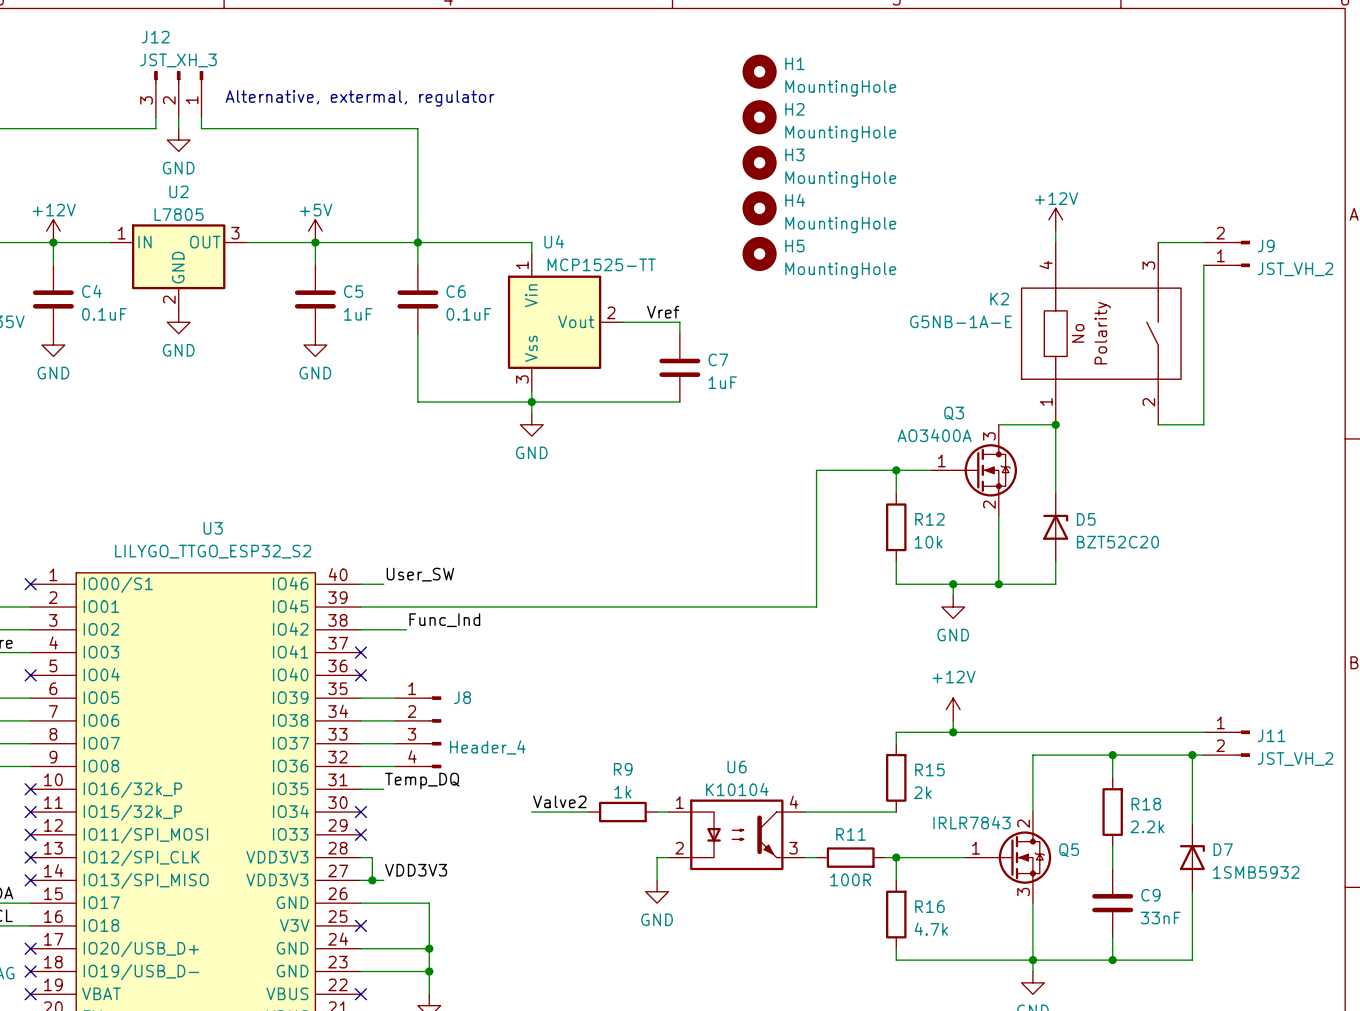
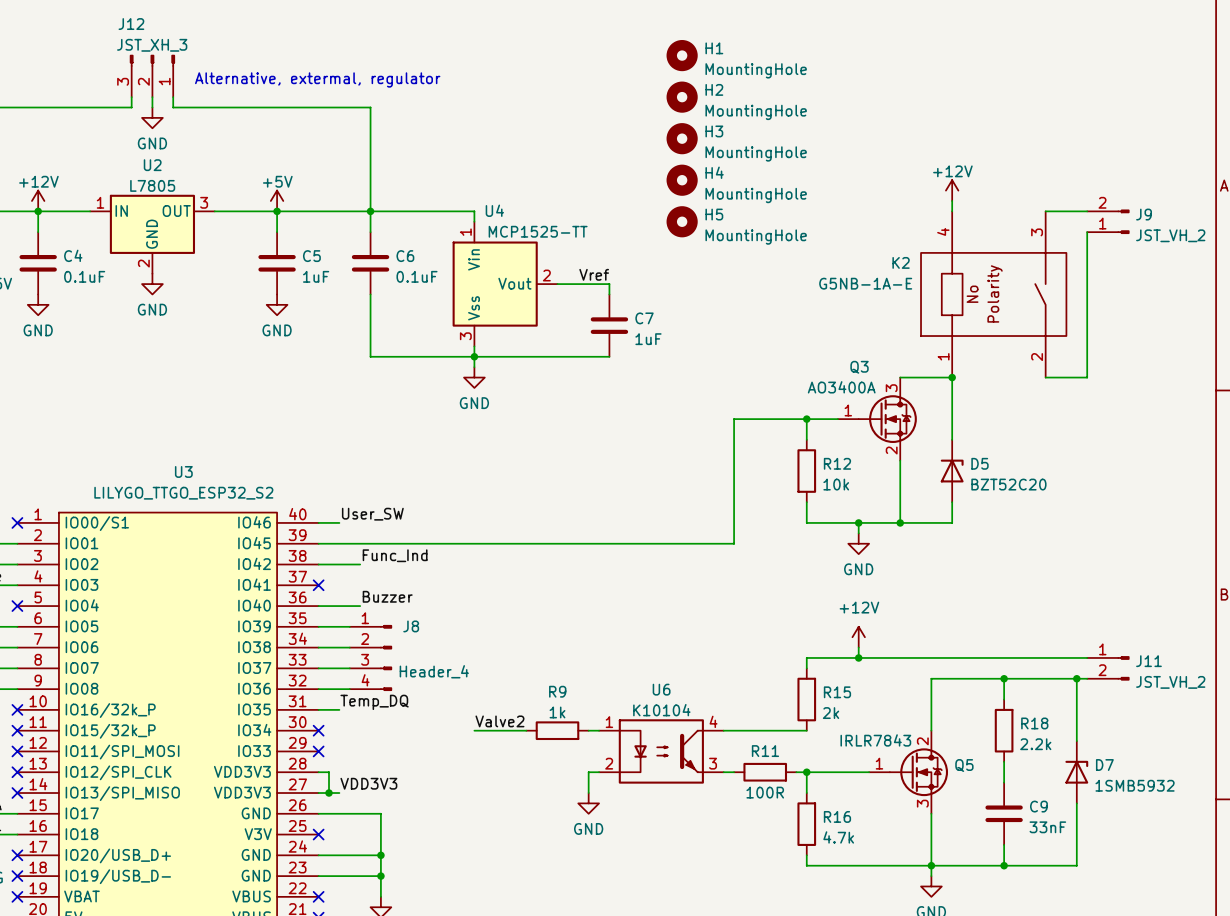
label: none -> Buzzer (387, 596)
wire: none -> (318, 606) (360, 606)
no-connect mark: (360, 675) -> none

